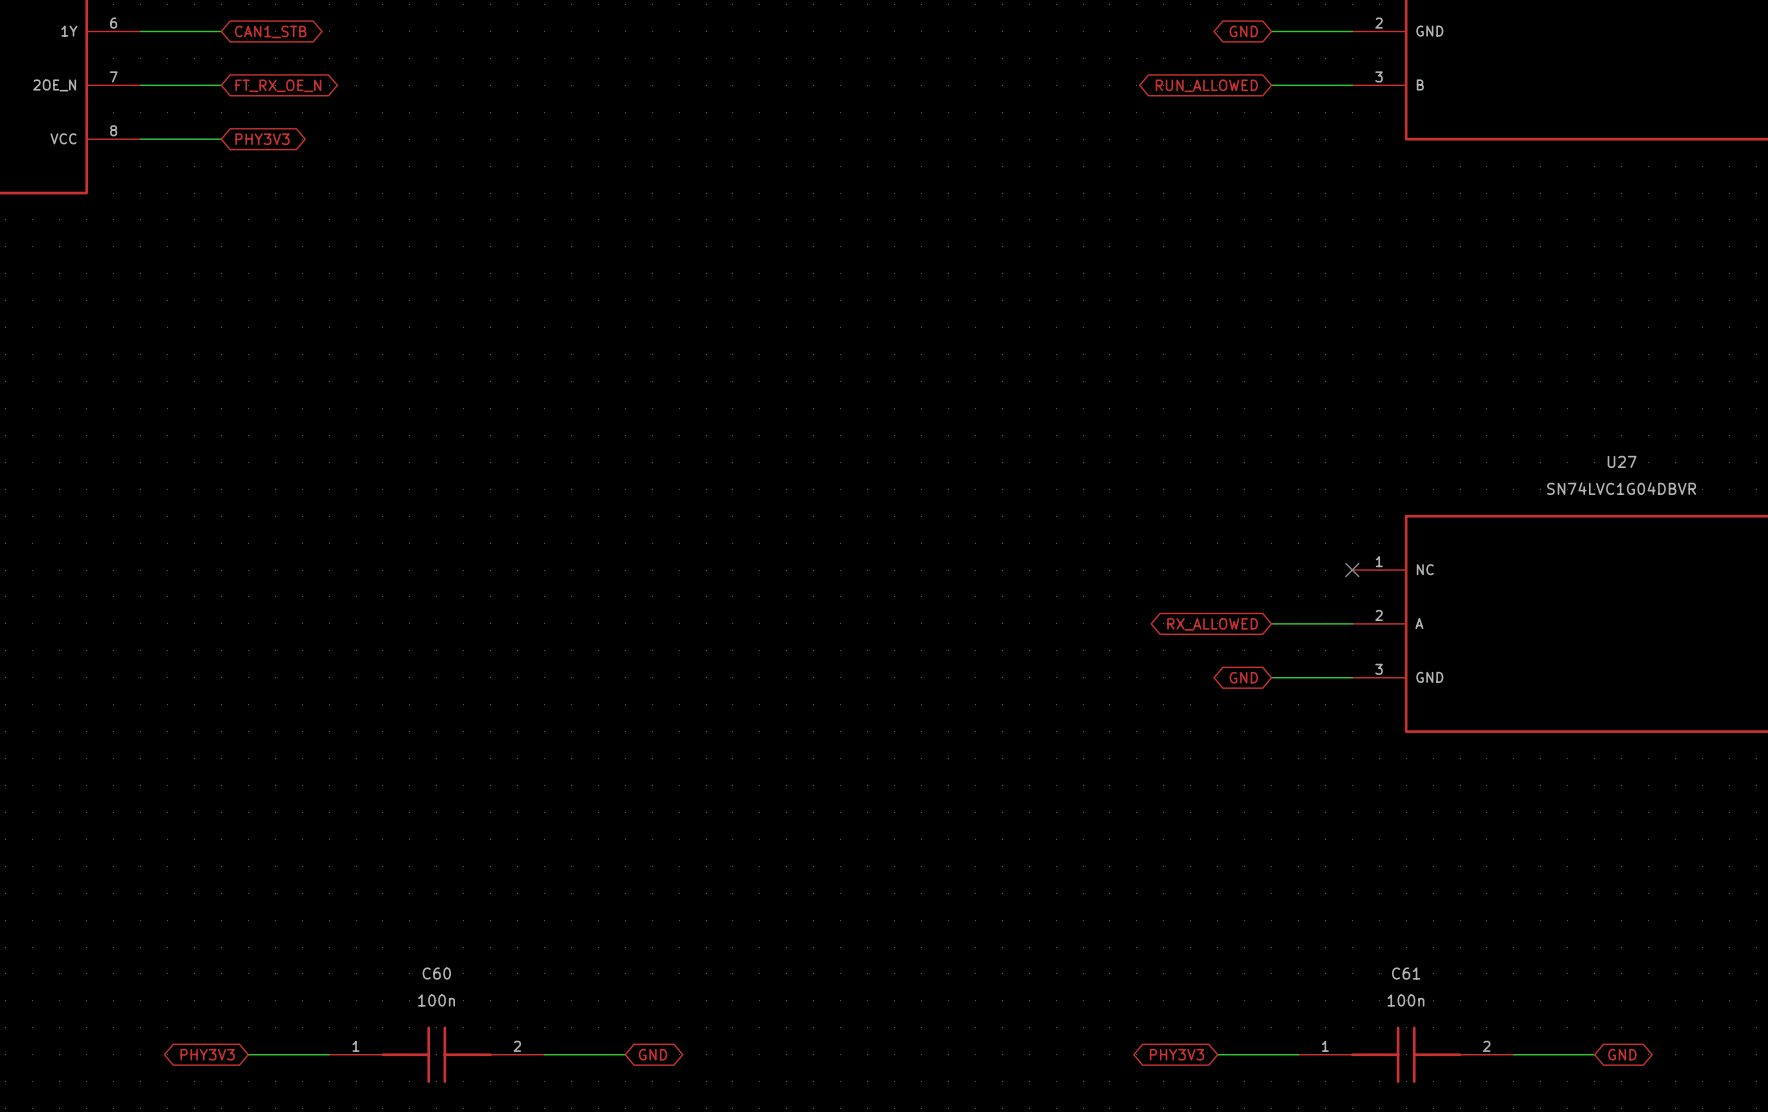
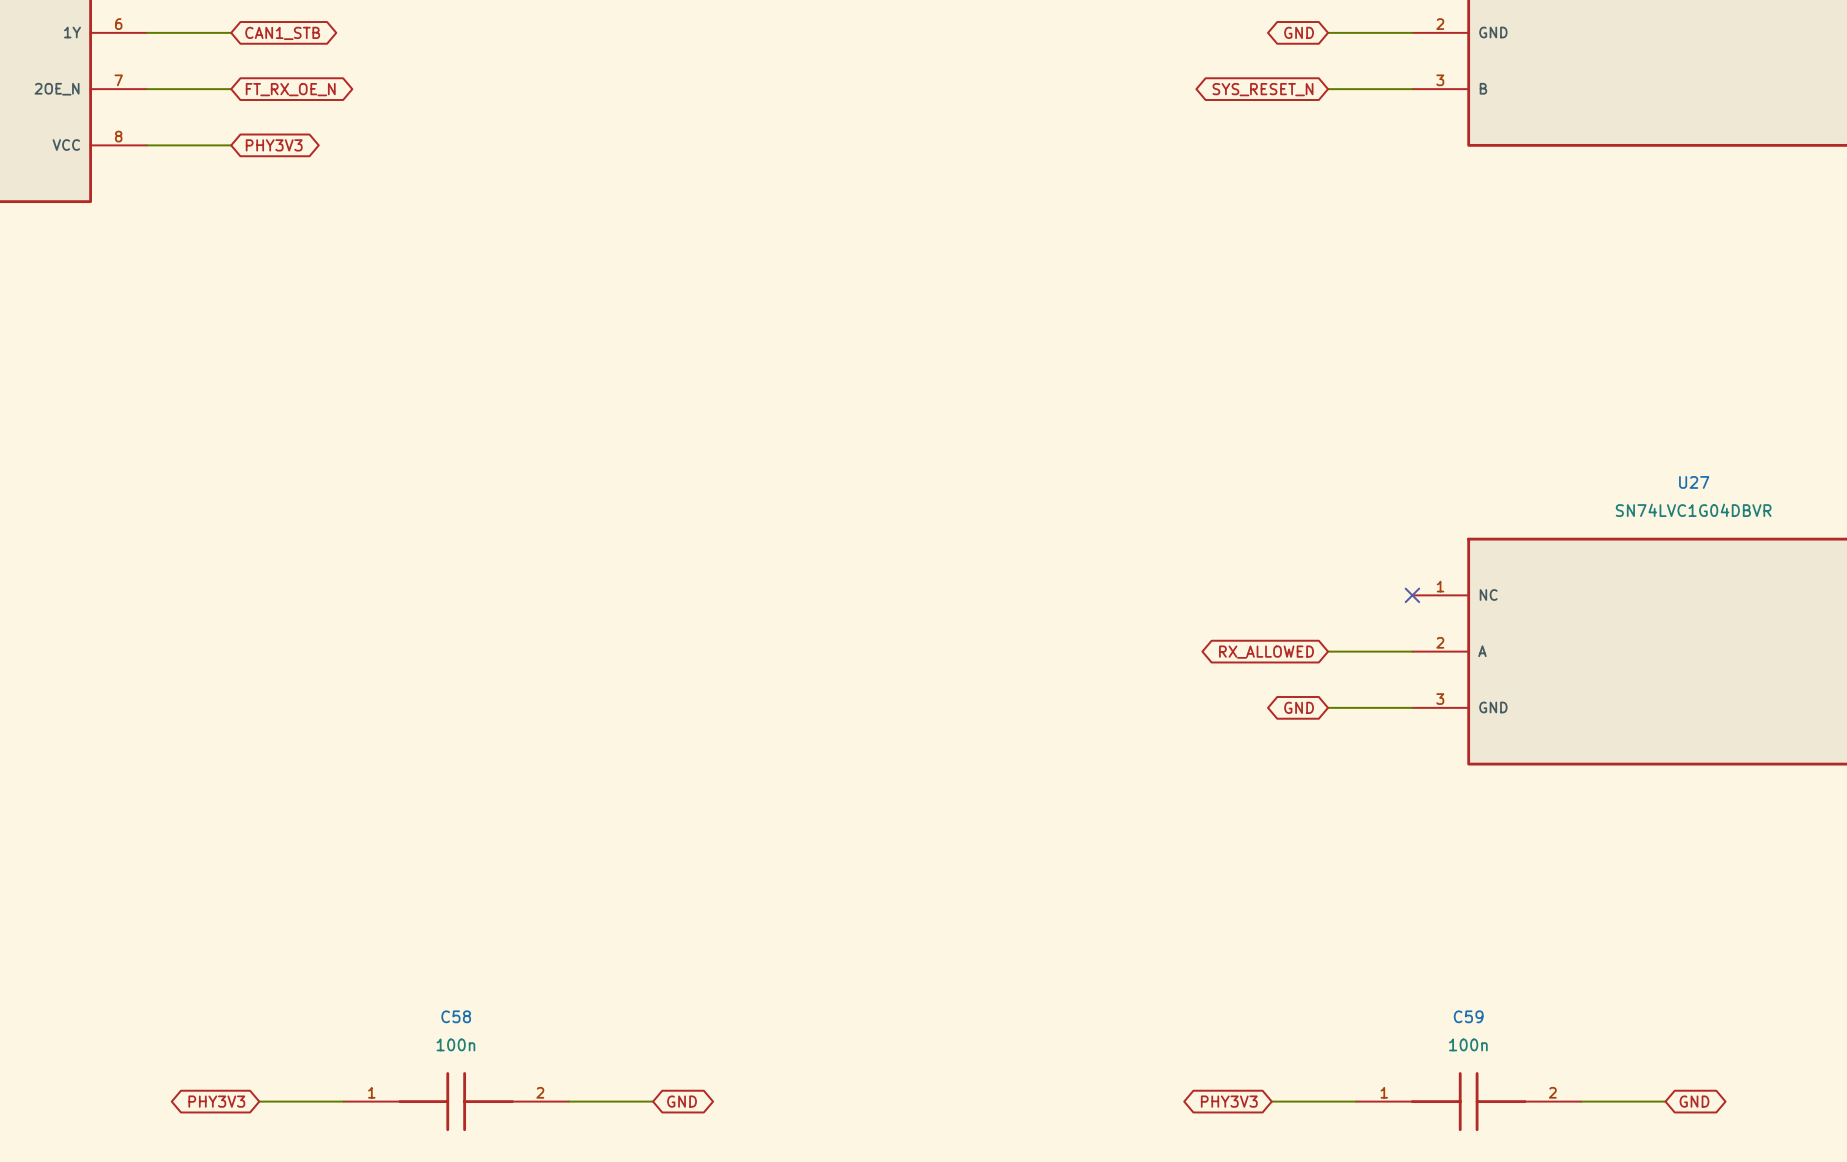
global label: RUN_ALLOWED (1206, 85) -> SYS_RESET_N (1263, 89)
C60 name: C60 (436, 973) -> C58 (456, 1016)
C61 name: C61 (1406, 973) -> C59 (1468, 1016)

